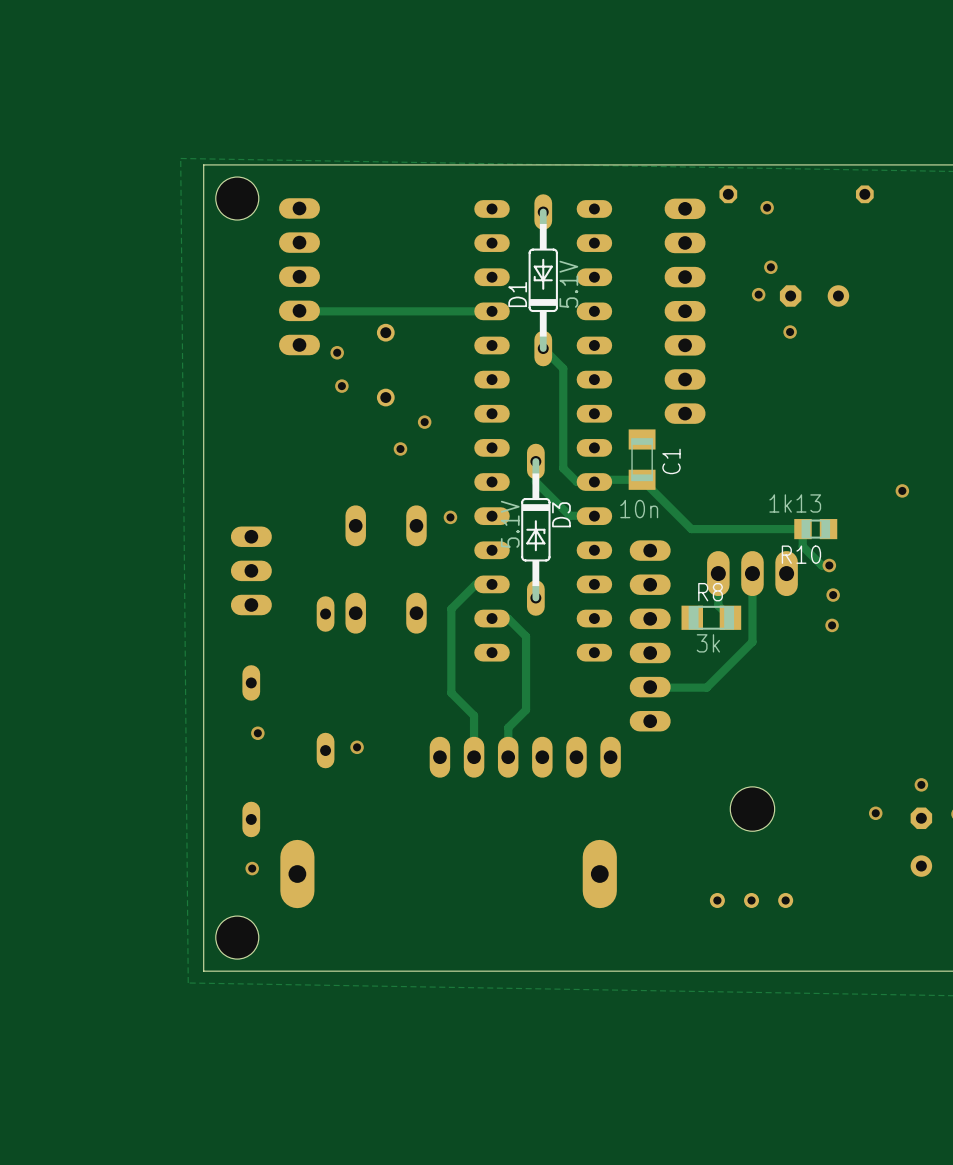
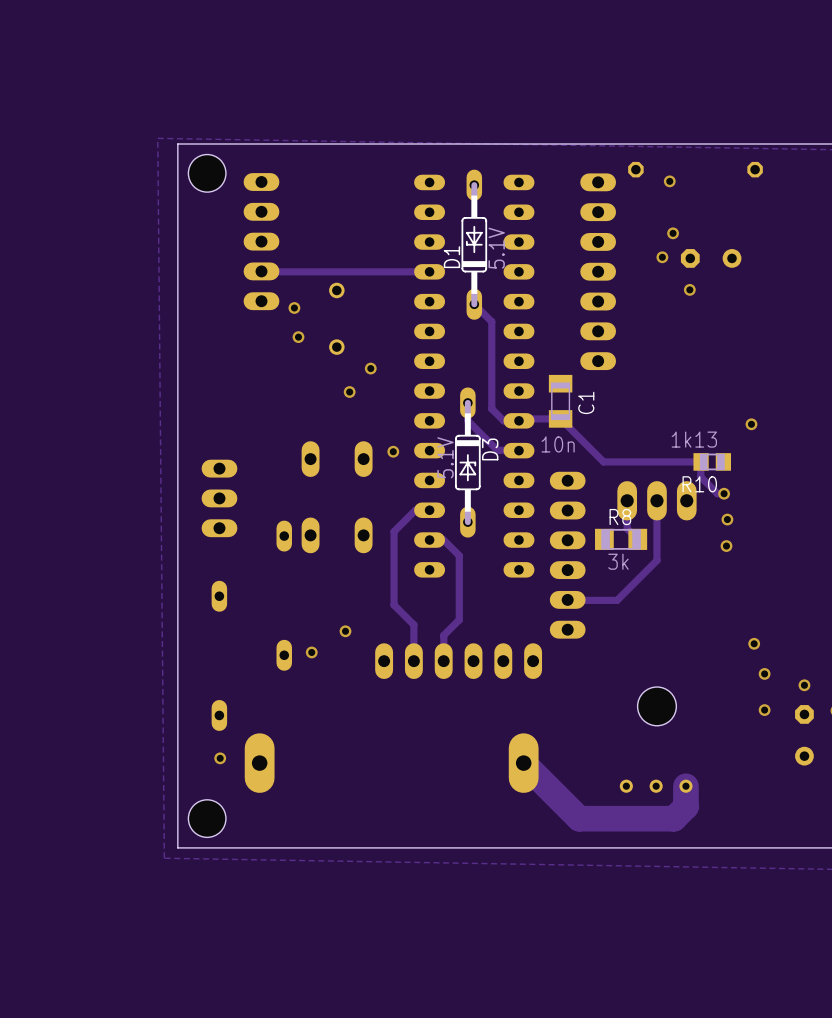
via position: (902, 490) -> (751, 424)
via: none -> (345, 631)
via: (257, 733) -> none
via: none -> (754, 643)
via: none -> (764, 673)
track: none -> (523, 763) (579, 818) (673, 818) (685, 806) (685, 786)

